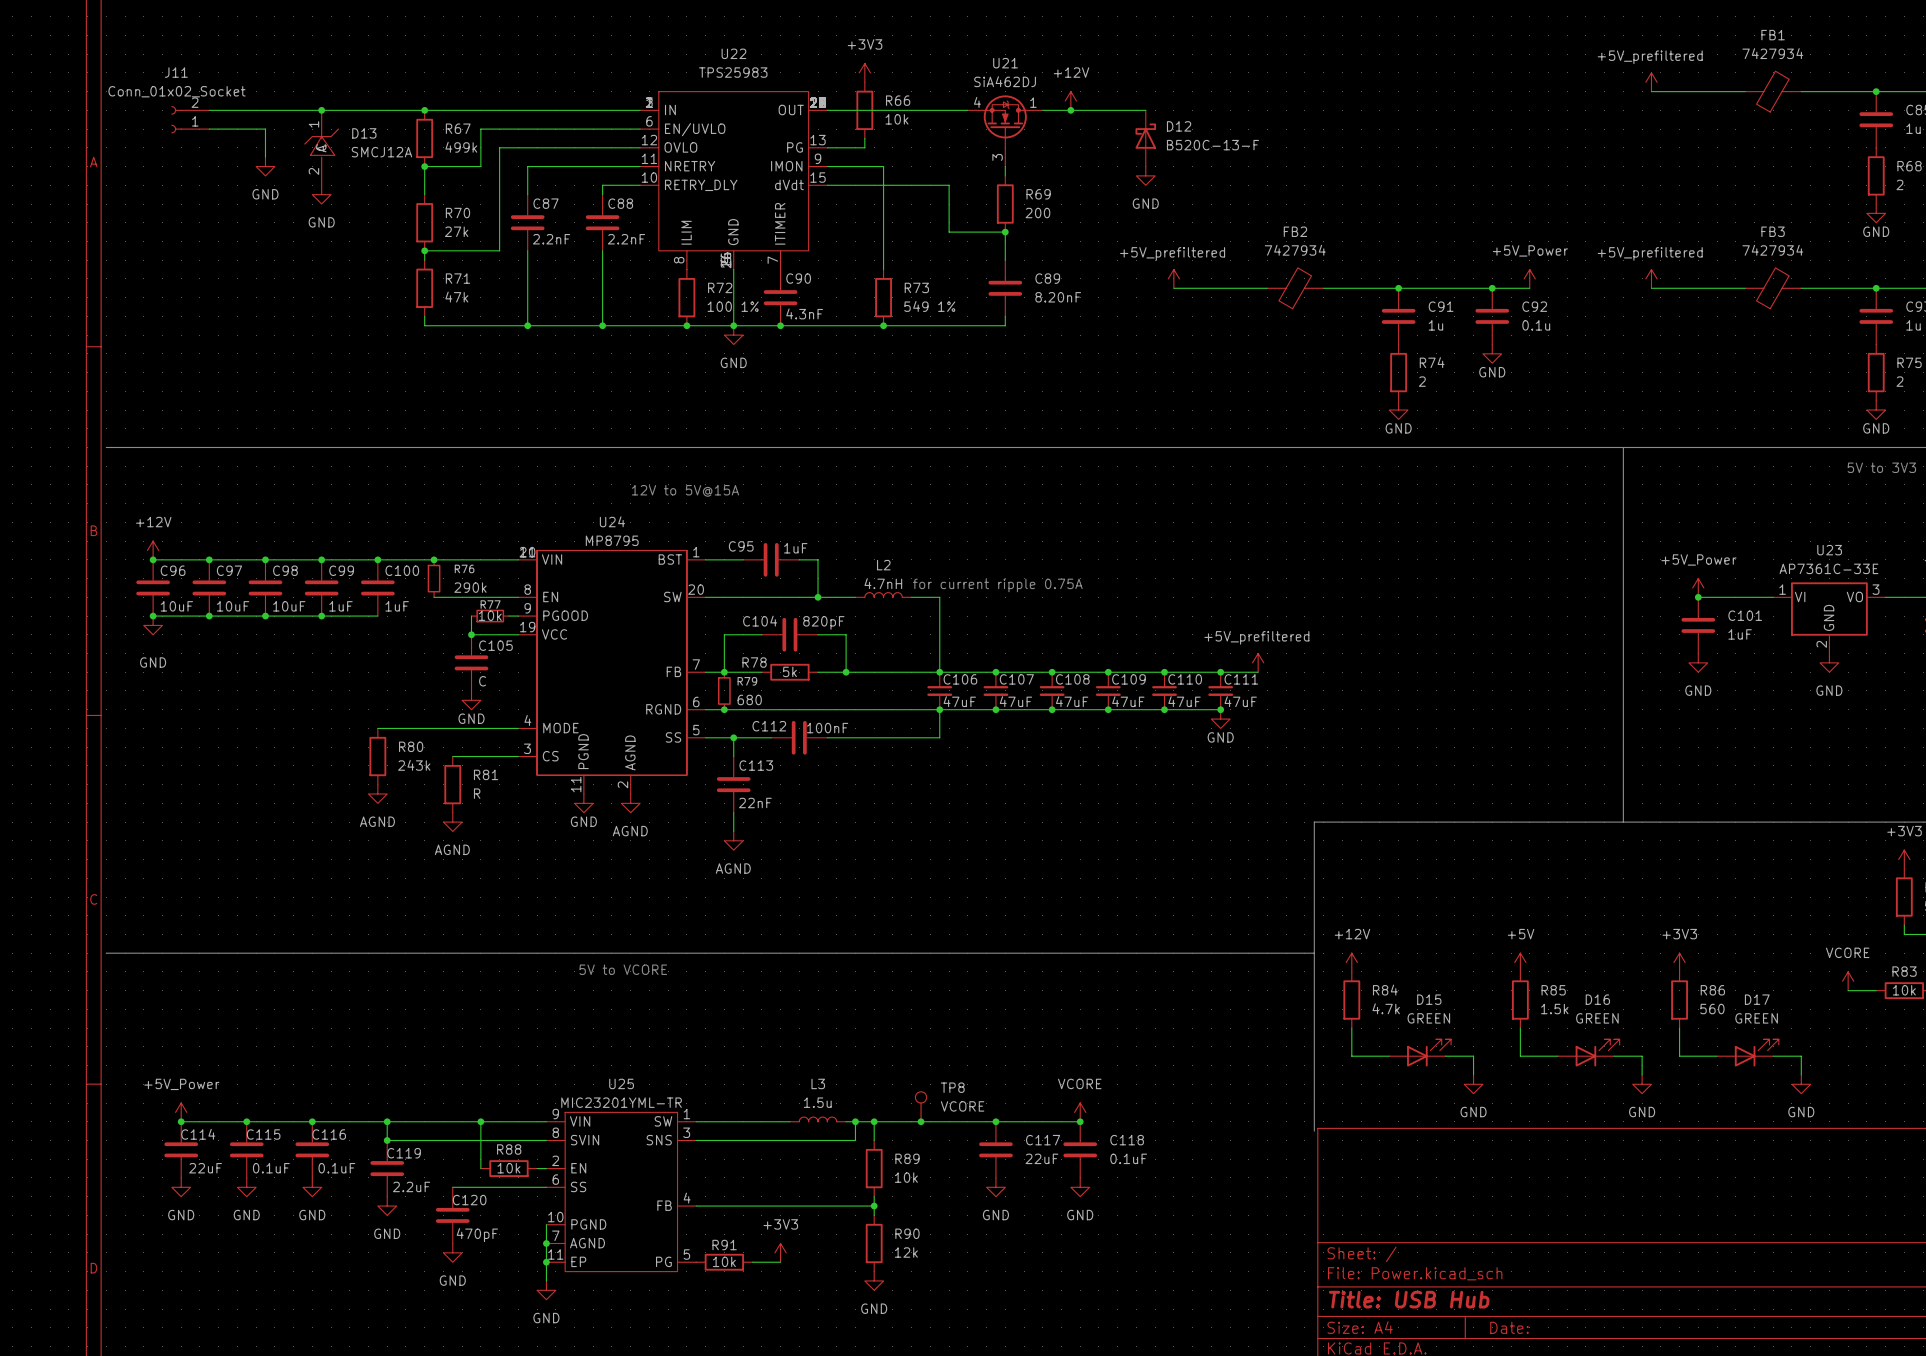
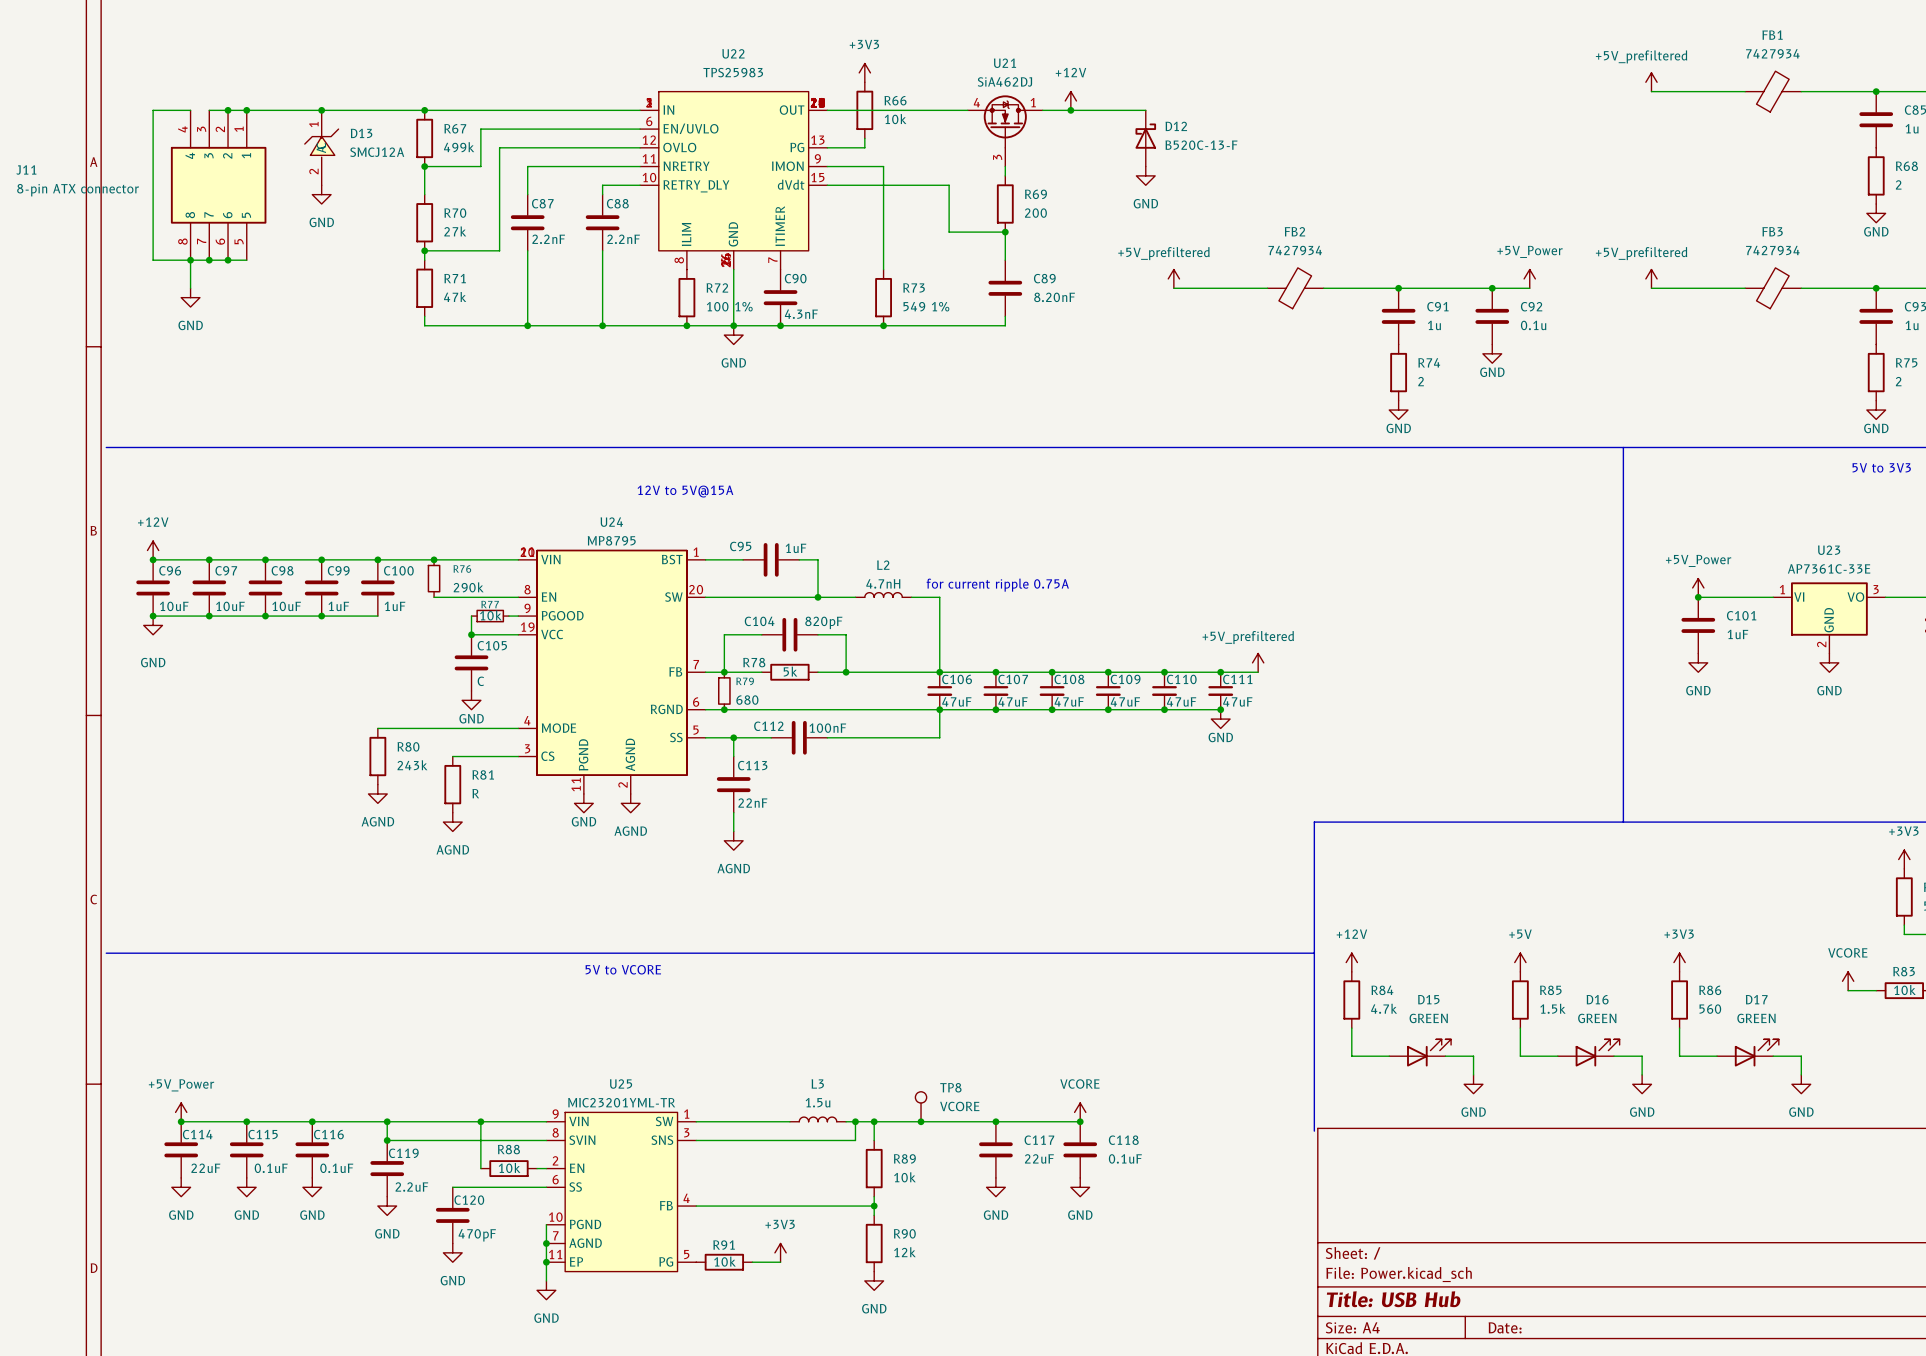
J11 name position: J11 (176, 72) -> J11 (26, 169)
J11 value: Conn_01x02_Socket (176, 91) -> 8-pin ATX connector (78, 190)
J11 symbol: [171, 106, 210, 134] -> [170, 110, 267, 261]
wire: none -> (190, 110) (153, 110) (153, 260) (246, 260)
junction: none -> (228, 110)
junction: none -> (246, 110)
wire: (209, 129) (265, 129) (265, 157) -> none
power symbol position: GND (265, 166) -> GND (190, 297)
wire: none -> (190, 260) (190, 288)
junction: none -> (190, 260)
junction: none -> (209, 260)
junction: none -> (228, 260)

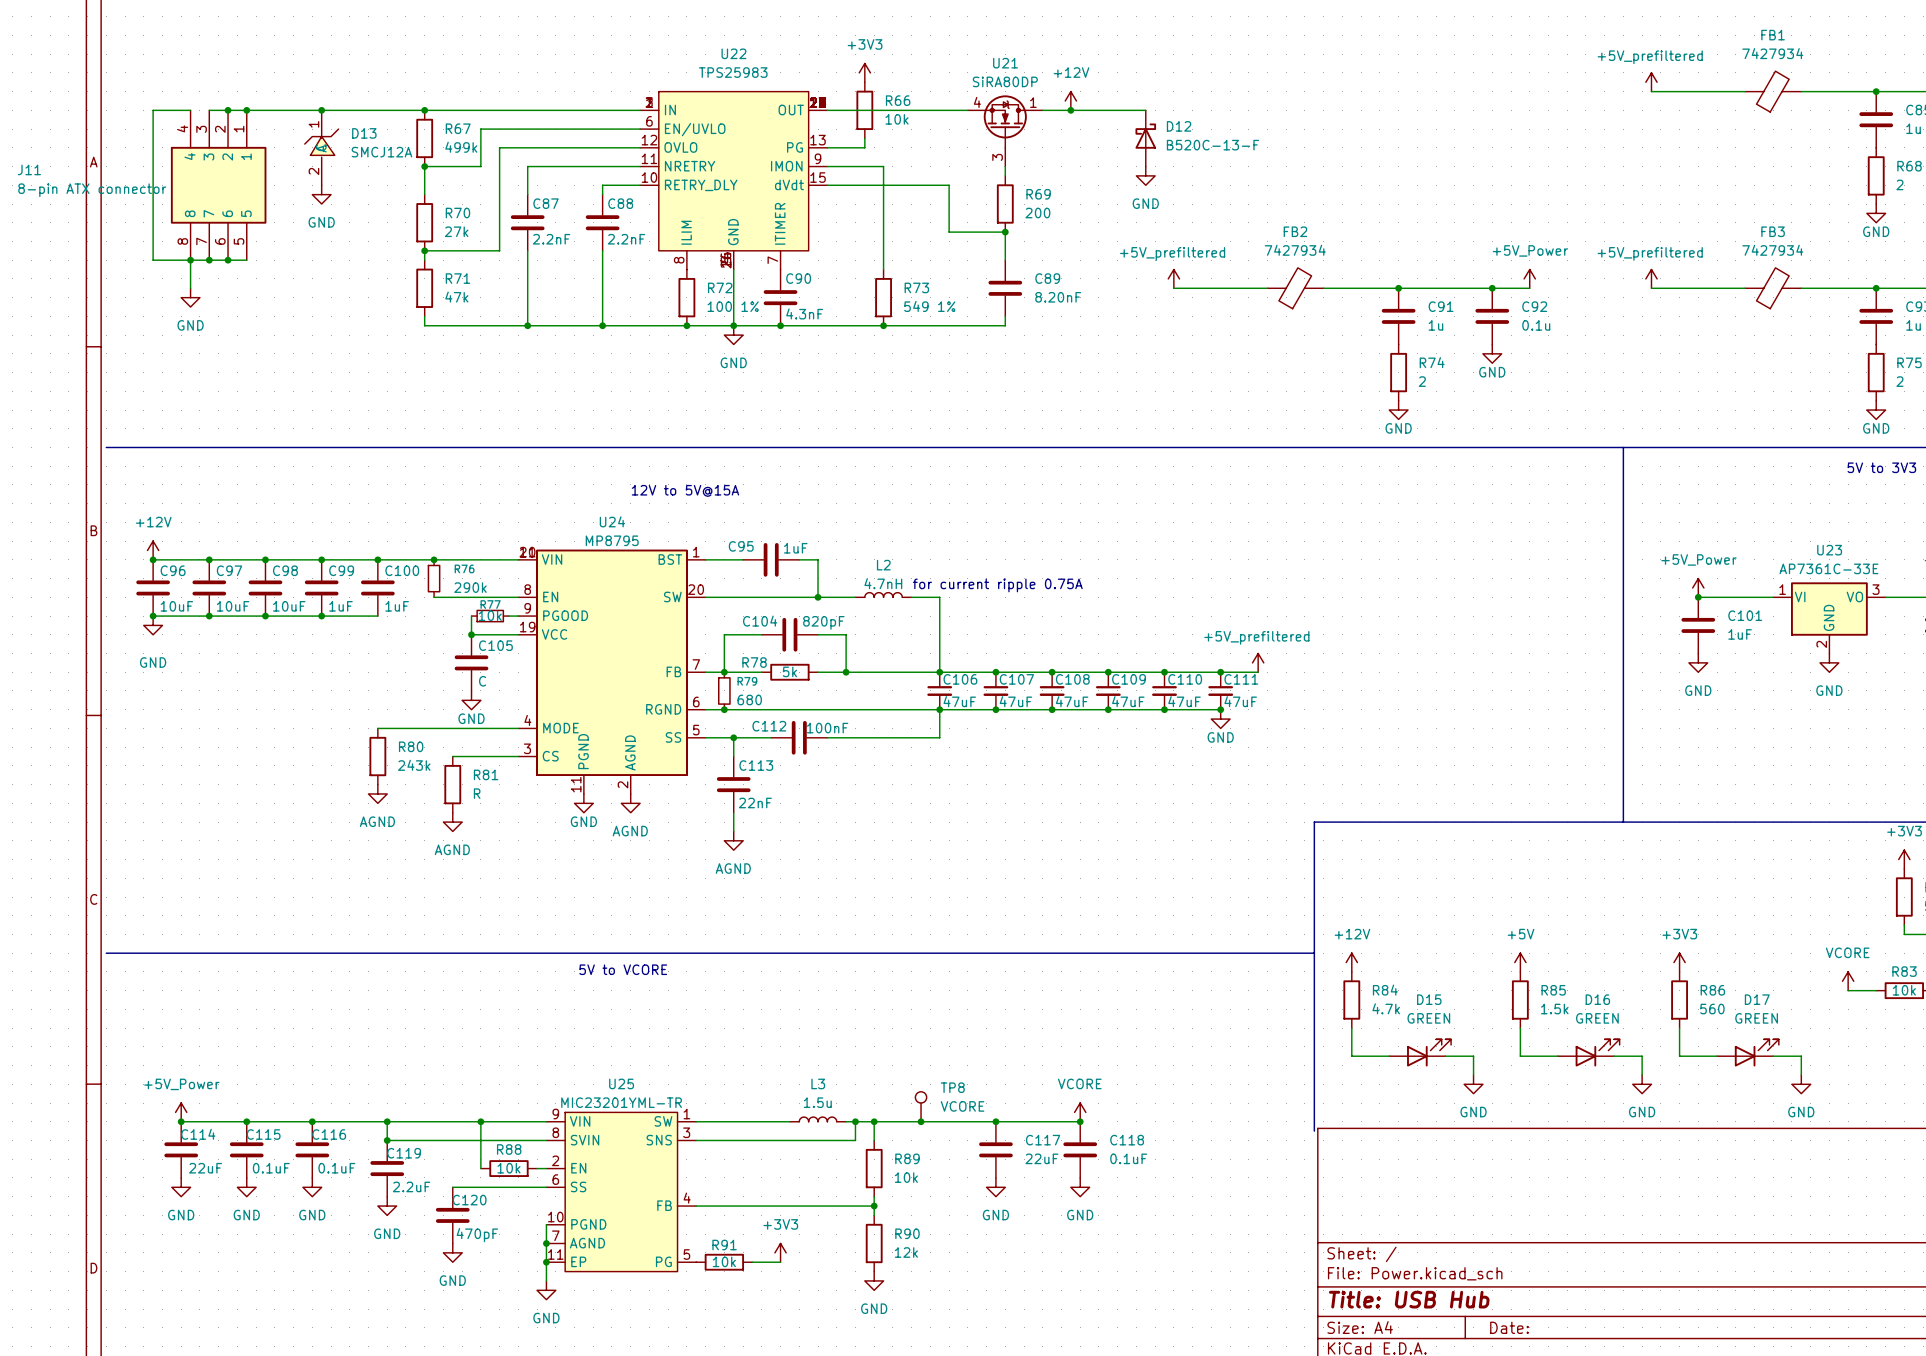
U21 value: SiA462DJ (1004, 81) -> SiRA80DP (1005, 81)

